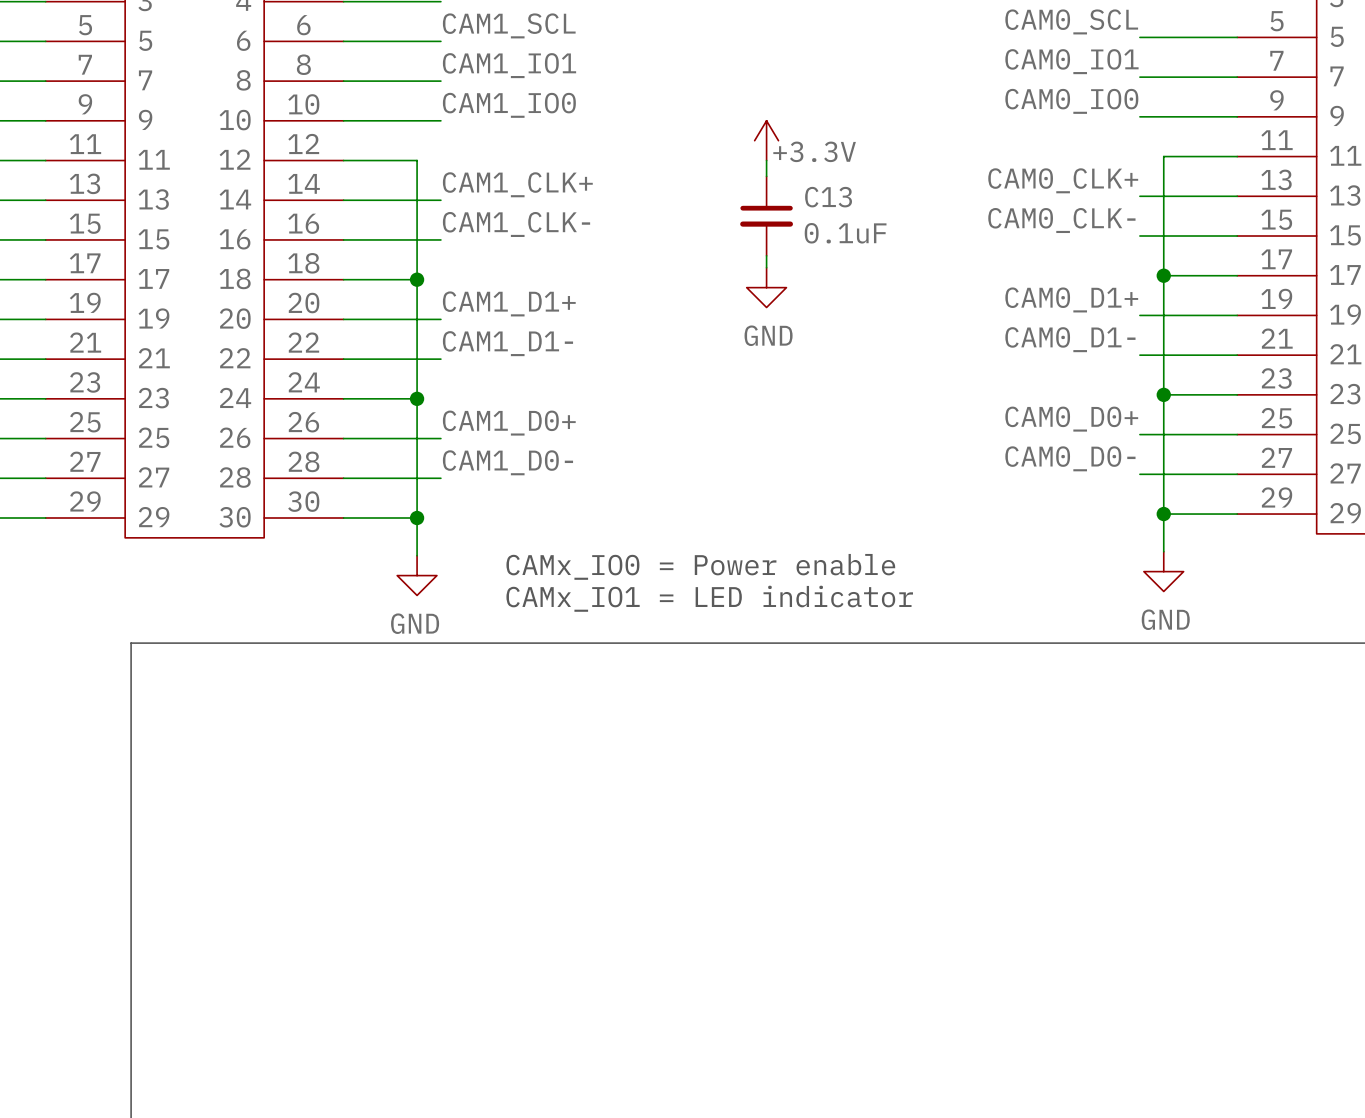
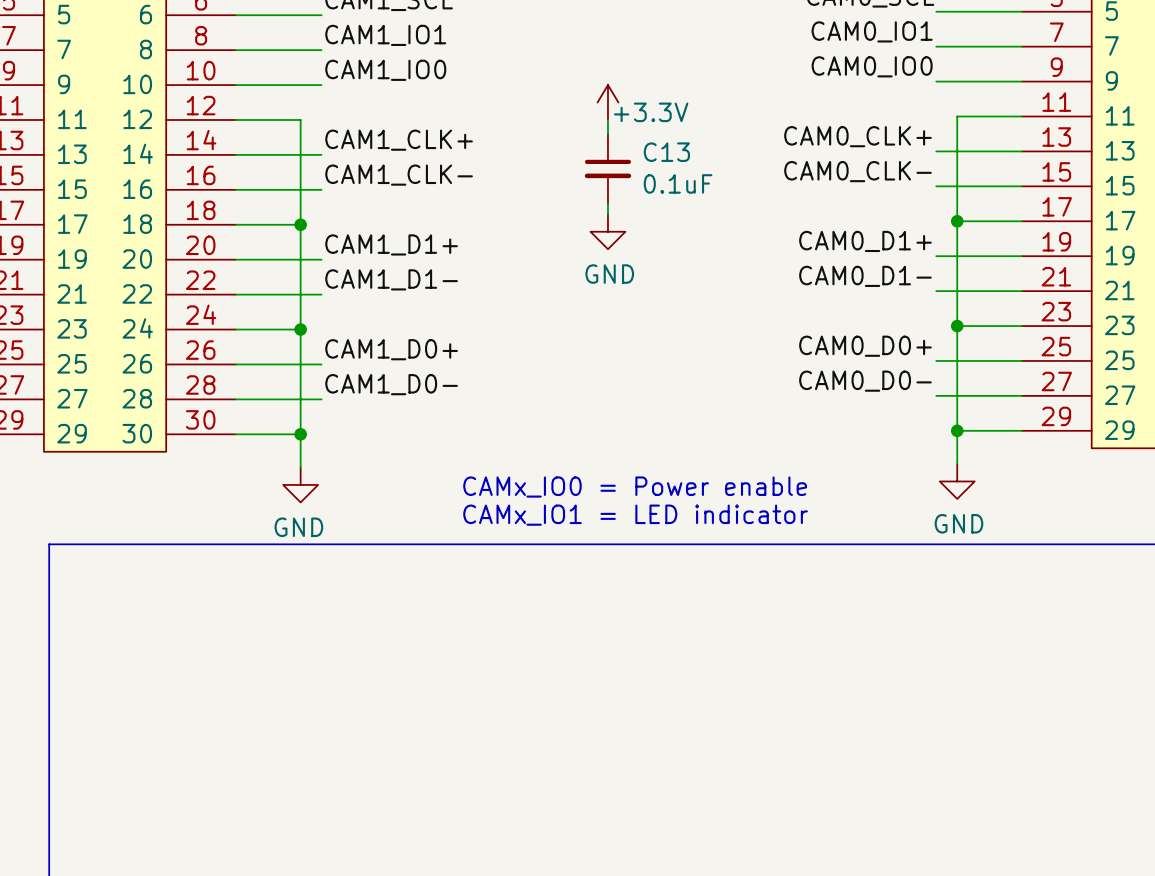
text position: CAMx_IO0 = Power enable (700, 566) -> CAMx_IO0 = Power enable (635, 487)
text position: CAMx_IO1 = LED indicator (709, 598) -> CAMx_IO1 = LED indicator (635, 515)

